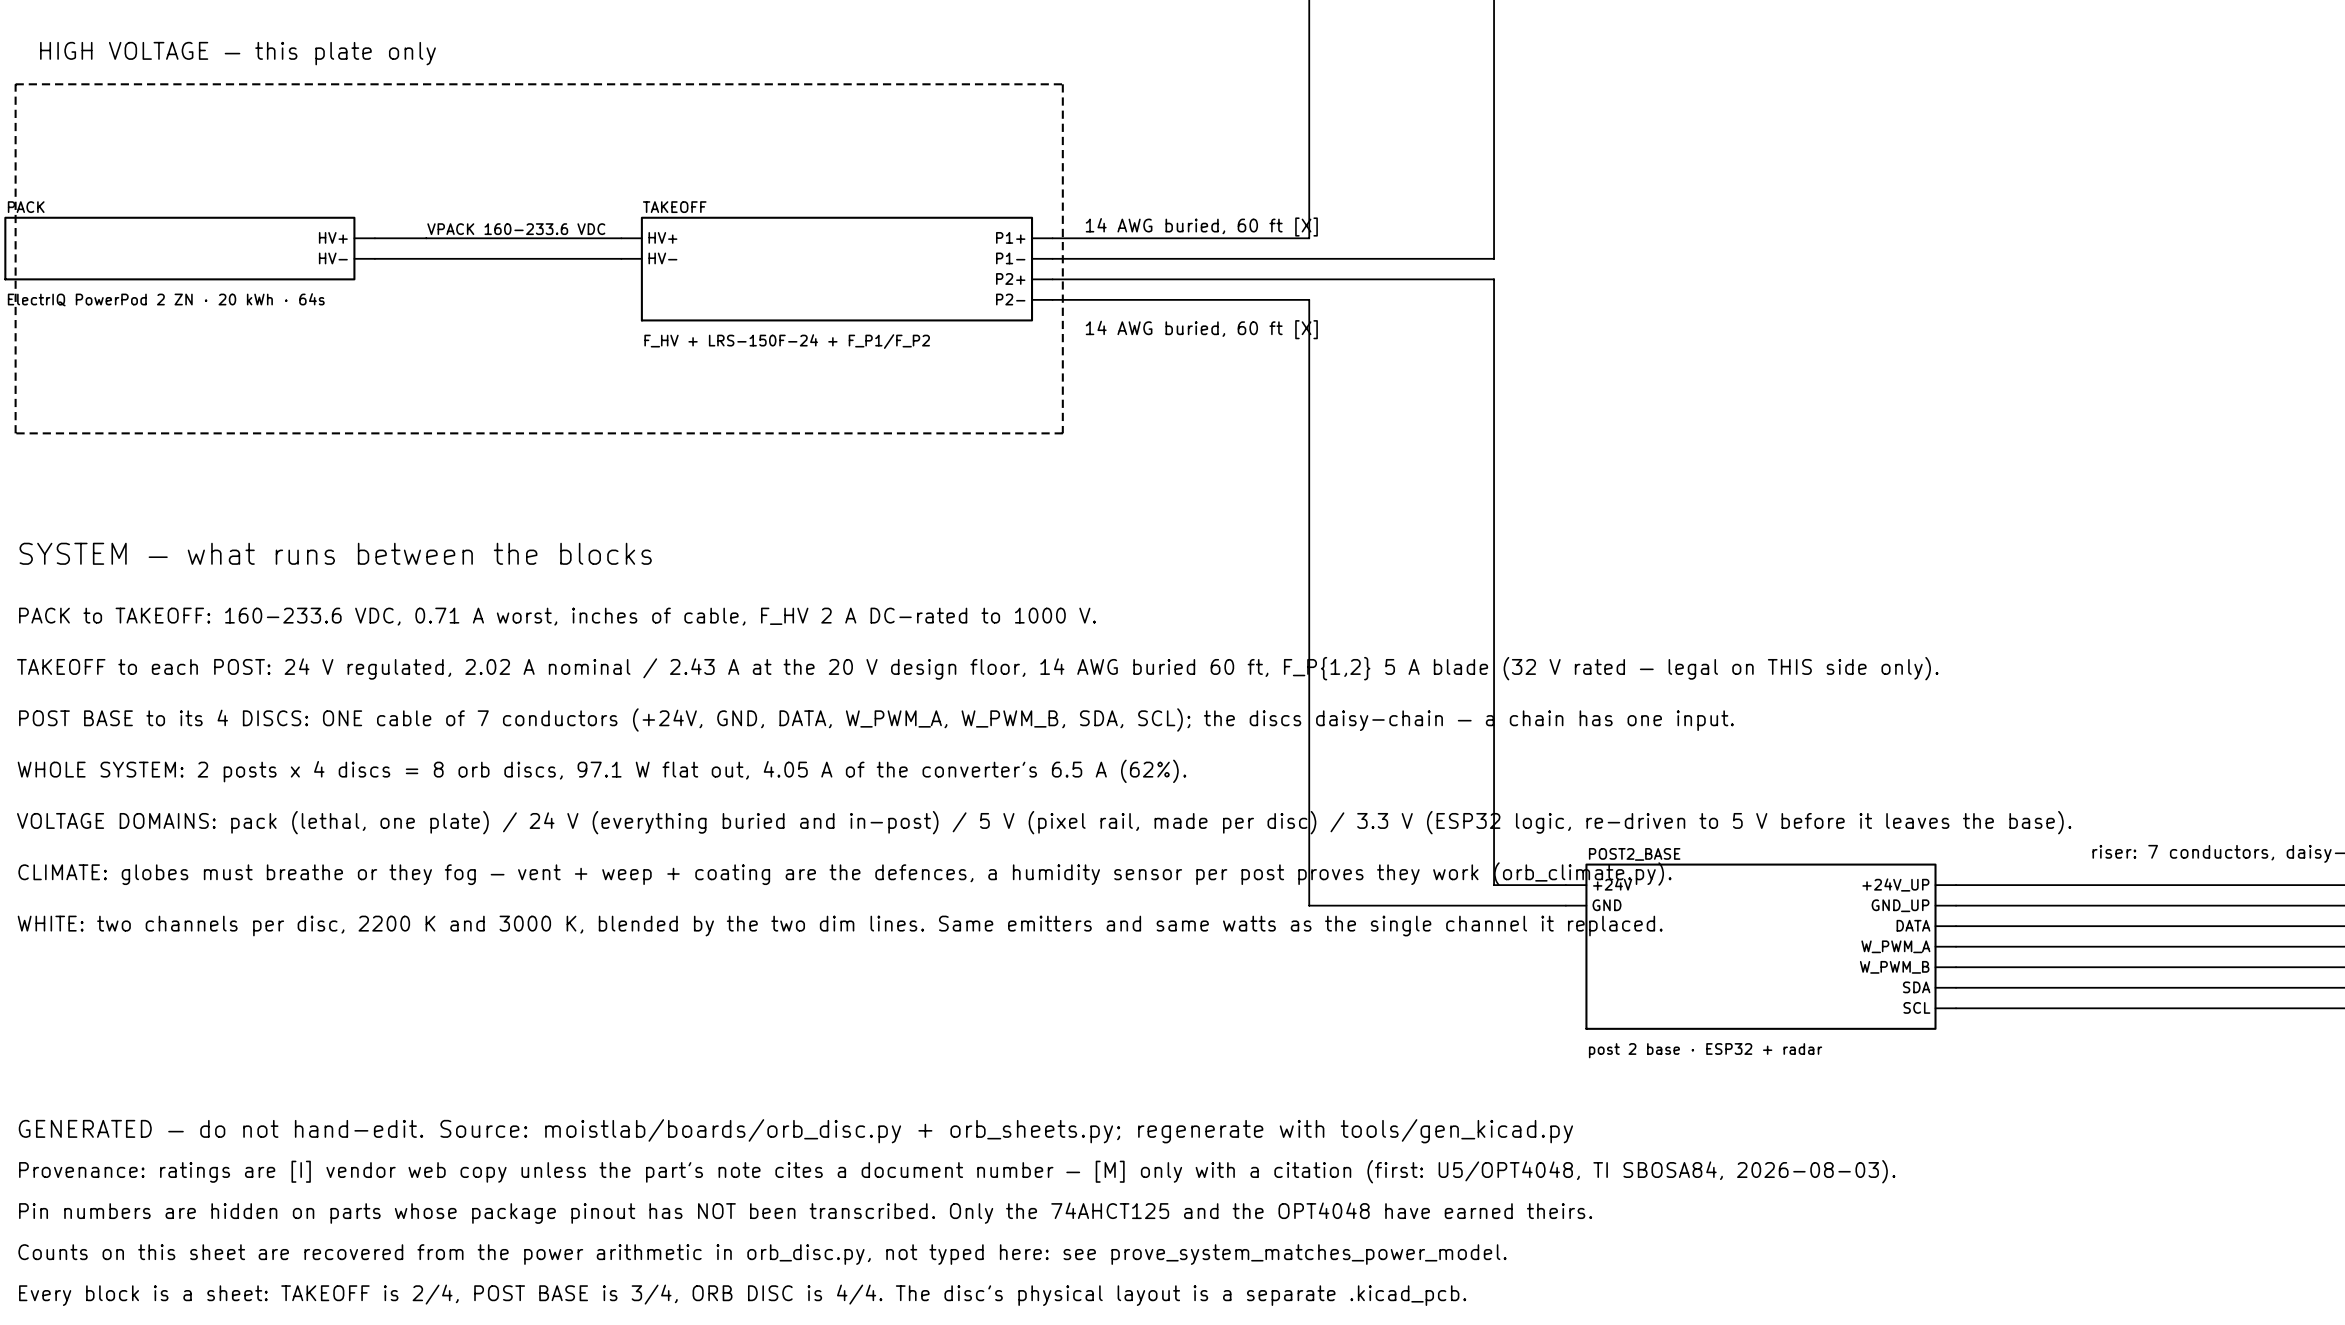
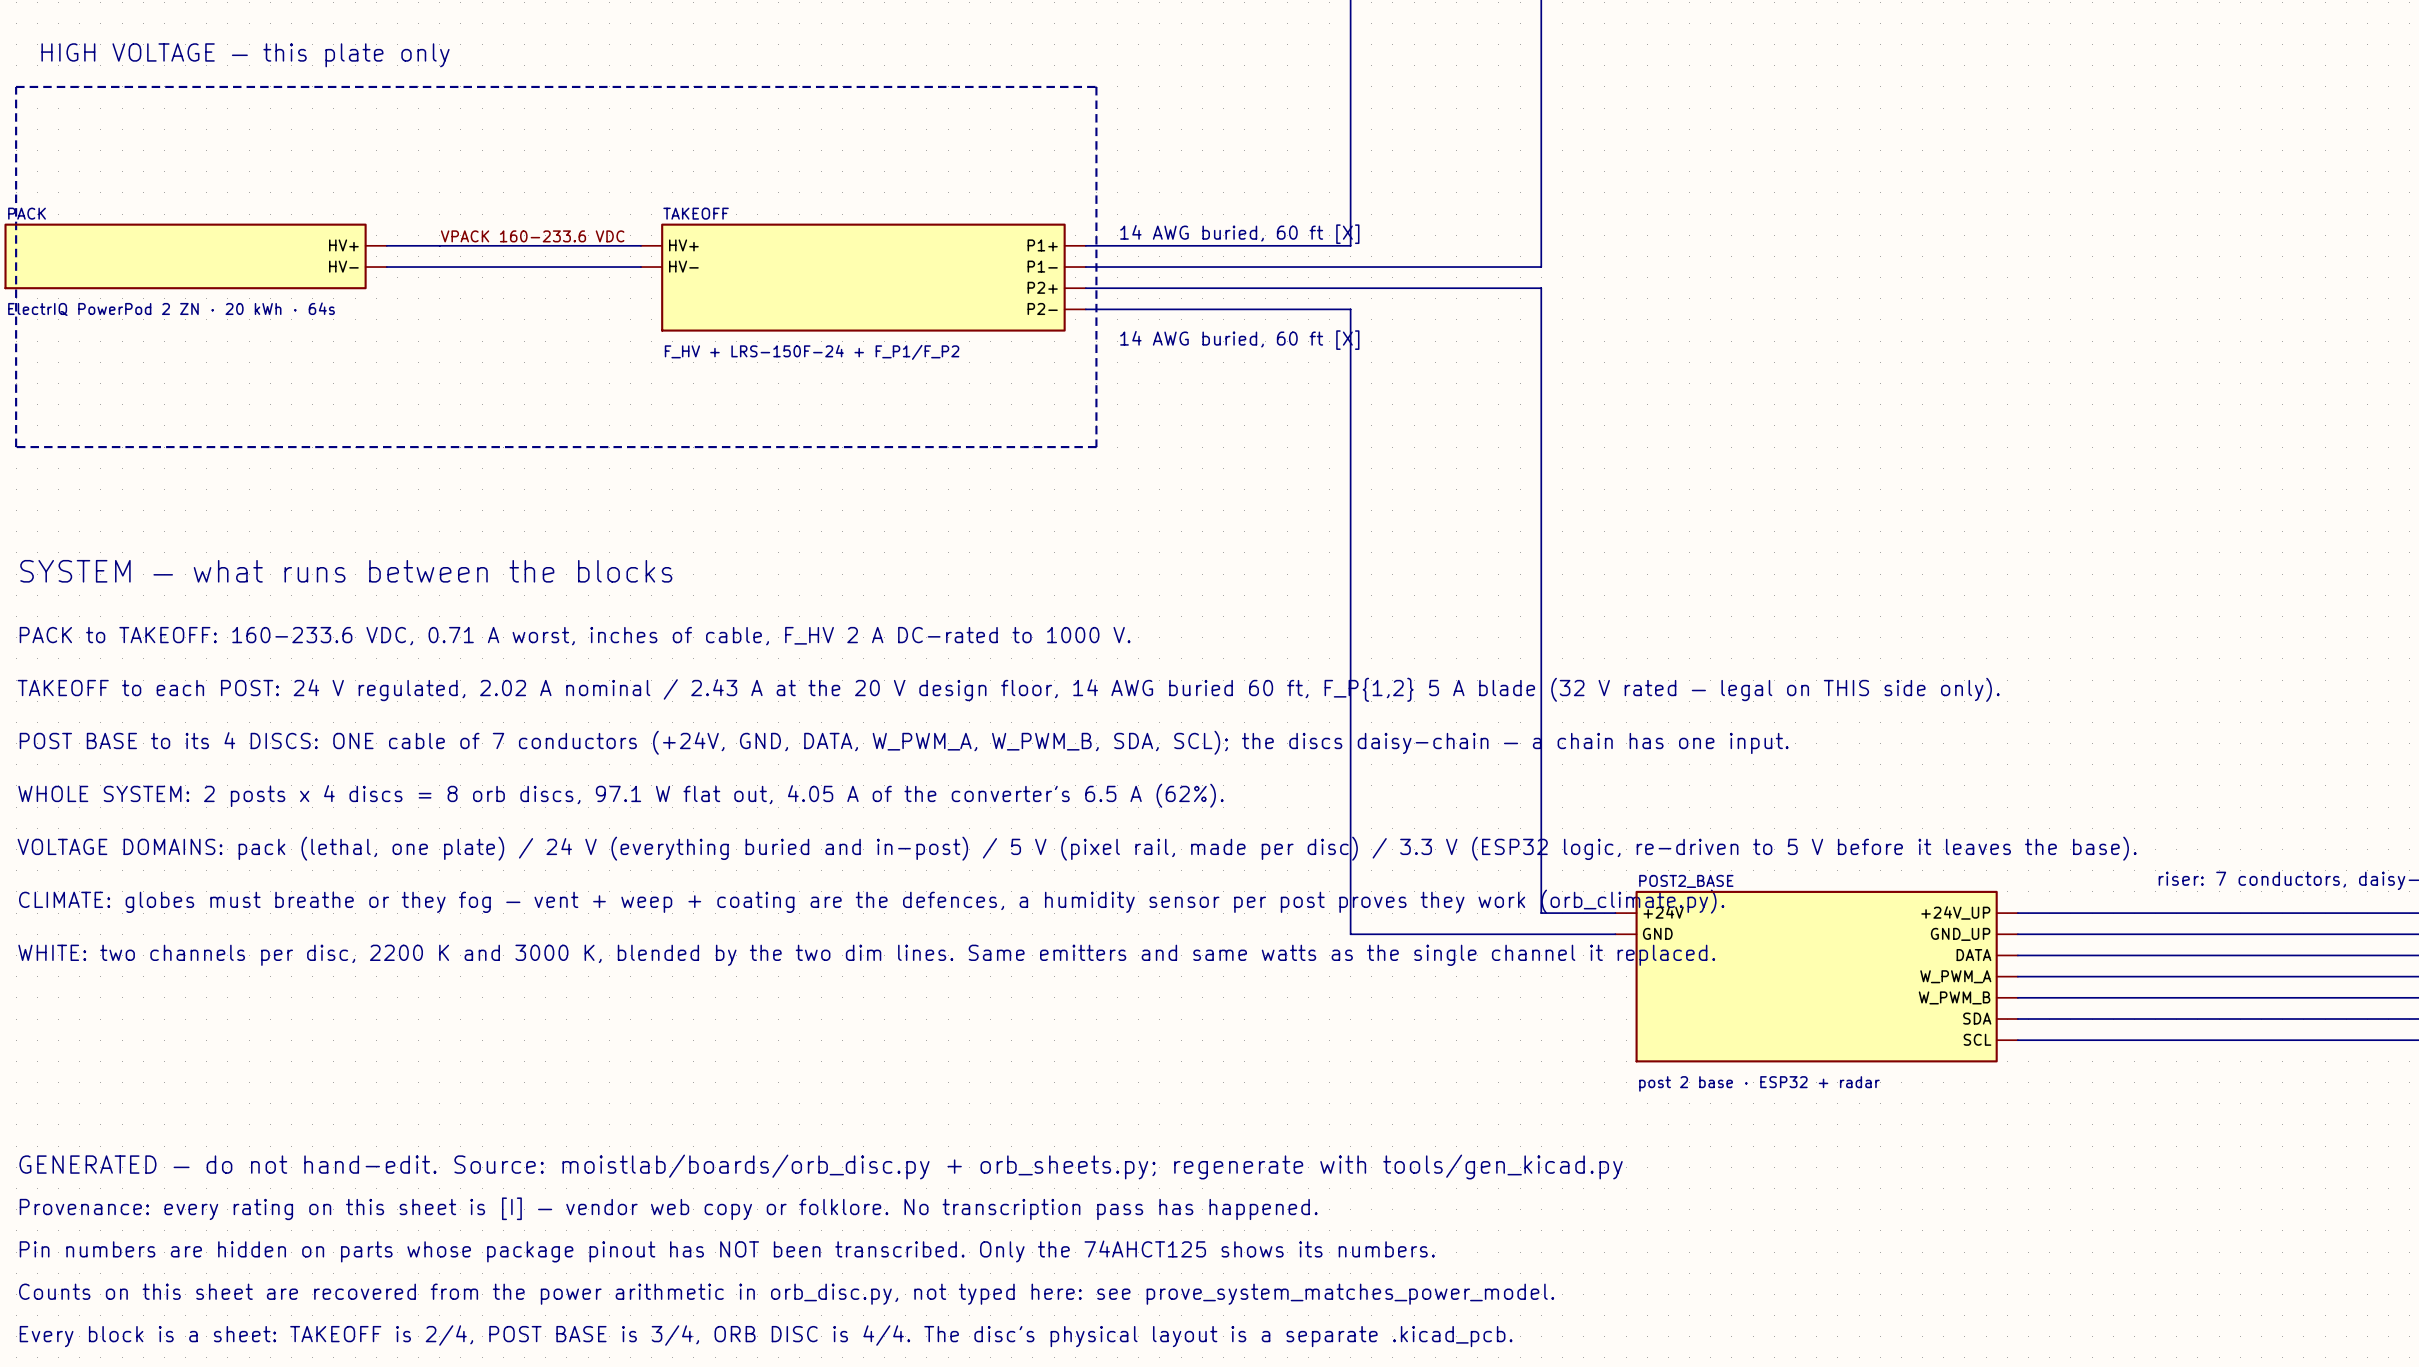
text: Provenance: ratings are [I] vendor web copy unless the part's note cites a document number — [M] only with a citation (first: U5/OPT4048, TI SBOSA84, 2026-08-03). (957, 1171) -> Provenance: every rating on this sheet is [I] — vendor web copy or folklore. No transcription pass has happened. (668, 1208)
text: Pin numbers are hidden on parts whose package pinout has NOT been transcribed. Only the 74AHCT125 and the OPT4048 have earned theirs. (805, 1213) -> Pin numbers are hidden on parts whose package pinout has NOT been transcribed. Only the 74AHCT125 shows its numbers. (727, 1251)

